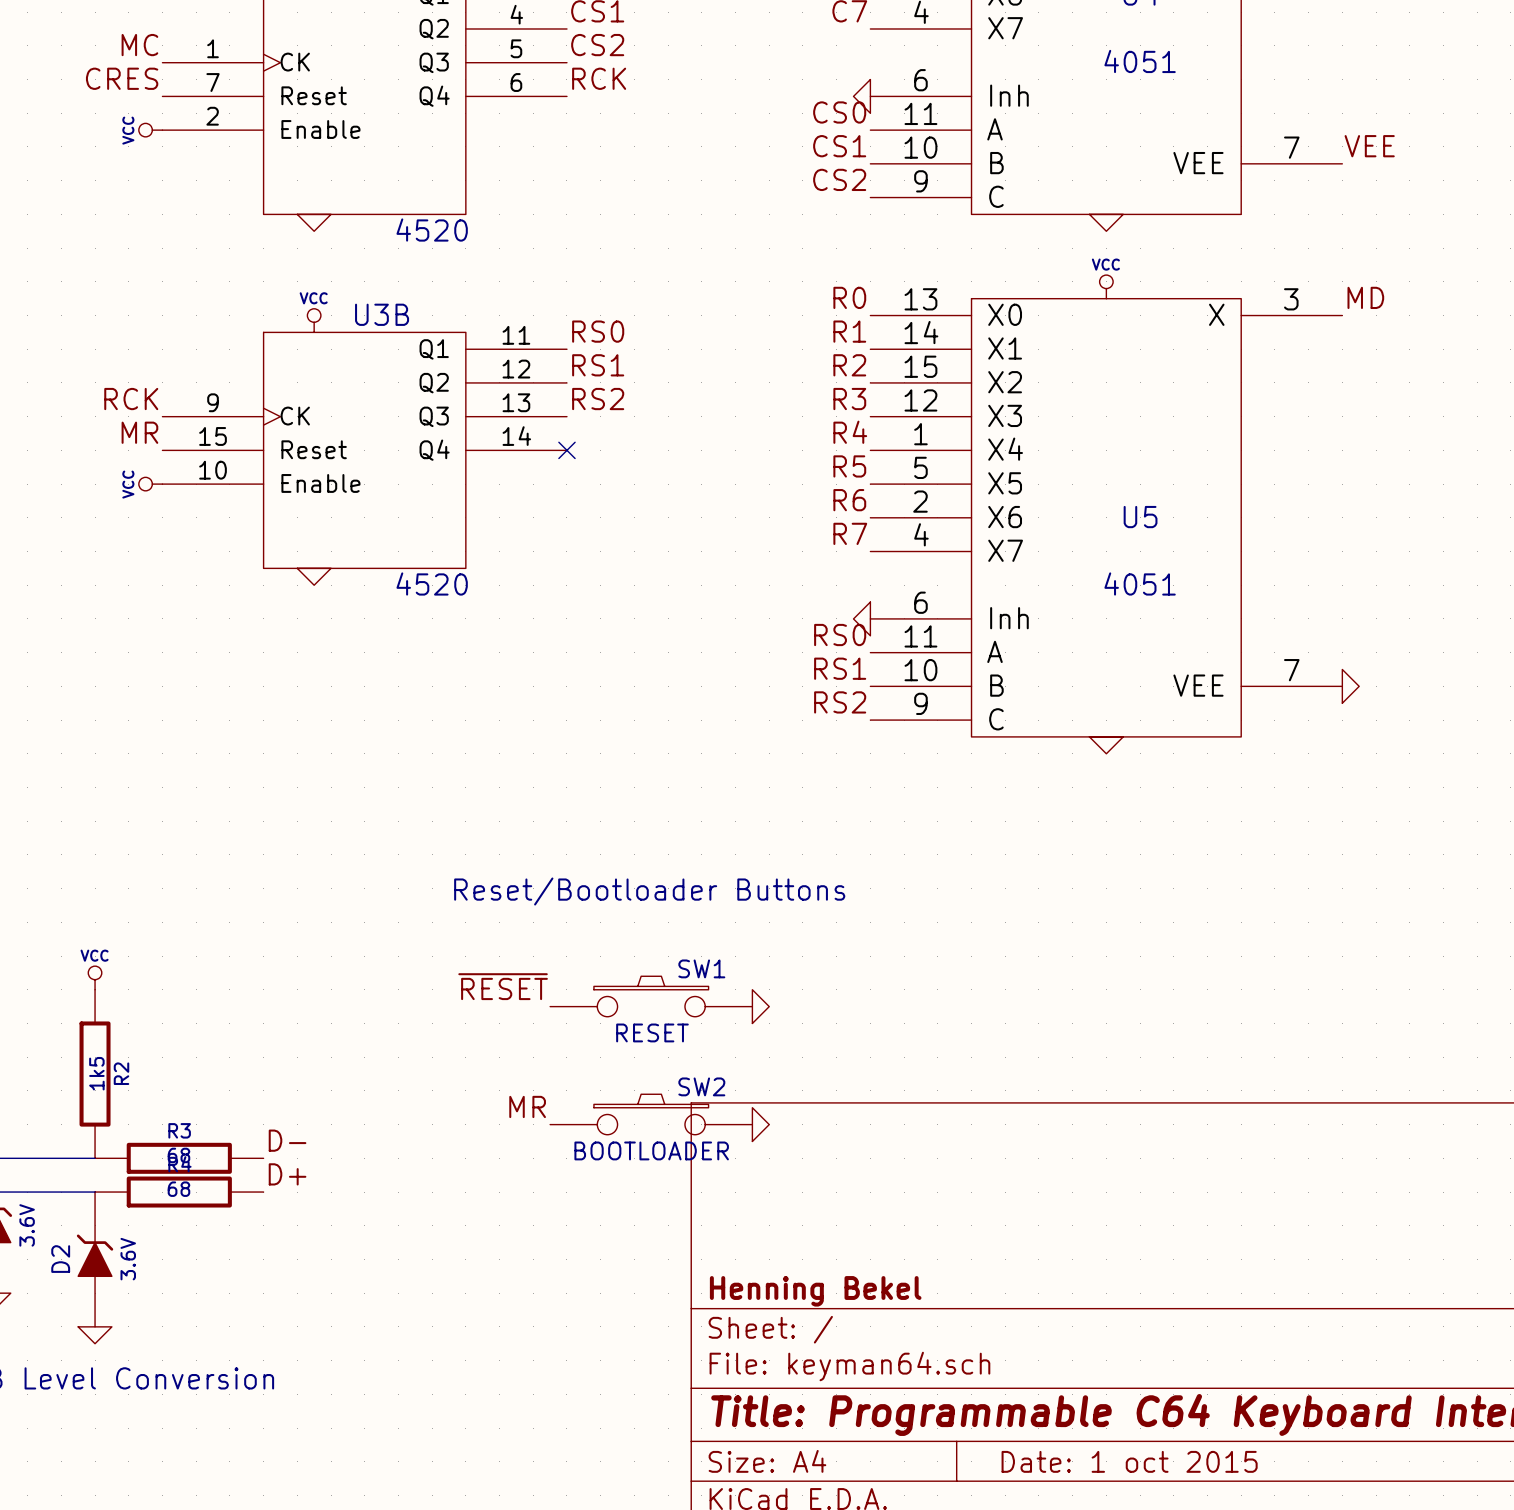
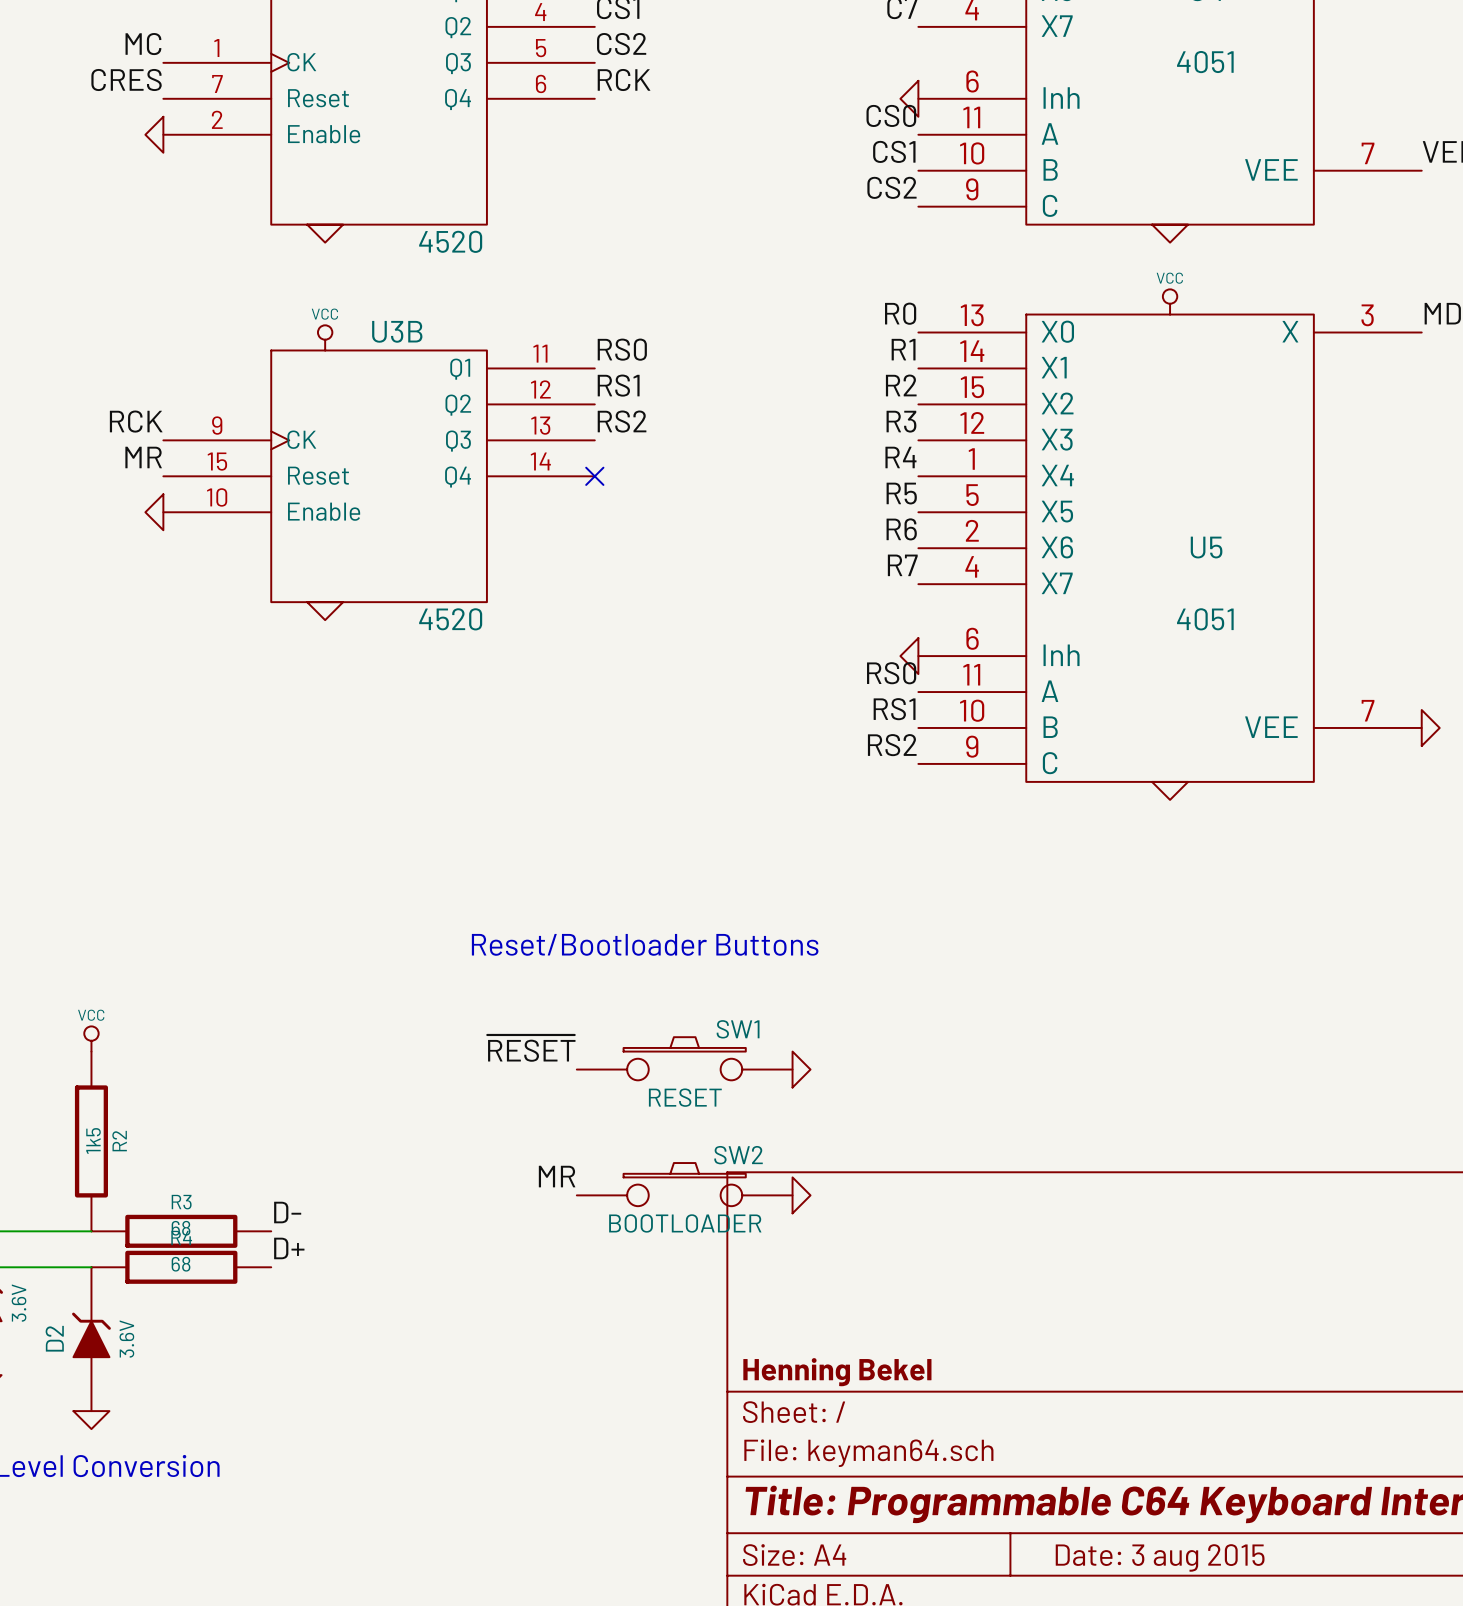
power symbol shape: [138, 123, 163, 137] -> [145, 116, 164, 153]
power symbol text: VCC (128, 130) -> none
power symbol shape: [138, 477, 163, 491] -> [145, 494, 164, 531]
power symbol text: VCC (128, 484) -> none
title block: Date: 1 oct 2015 (1129, 1461) -> Date: 3 aug 2015 (1160, 1557)

